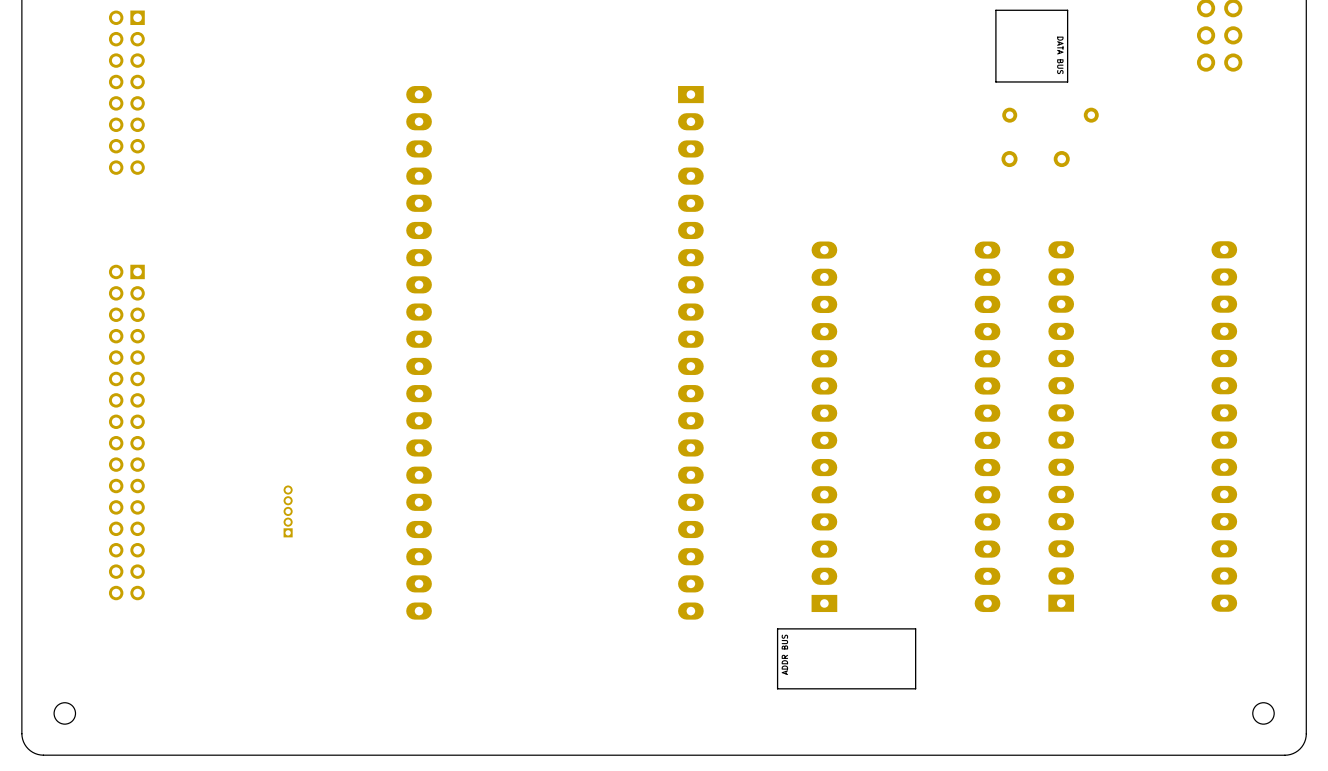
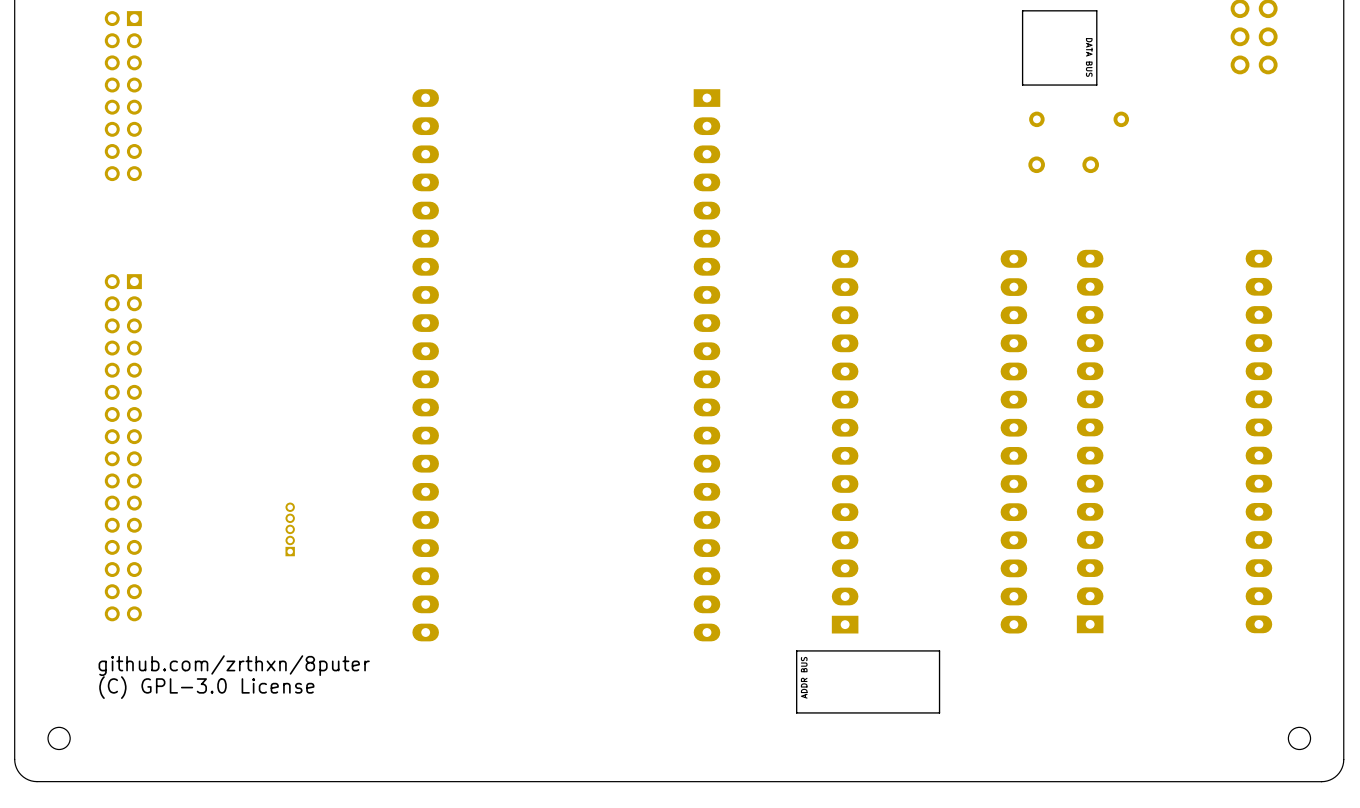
text: none -> github.com/zrthxn/8puter (234, 665)
text: none -> (C) GPL-3.0 License (206, 687)

